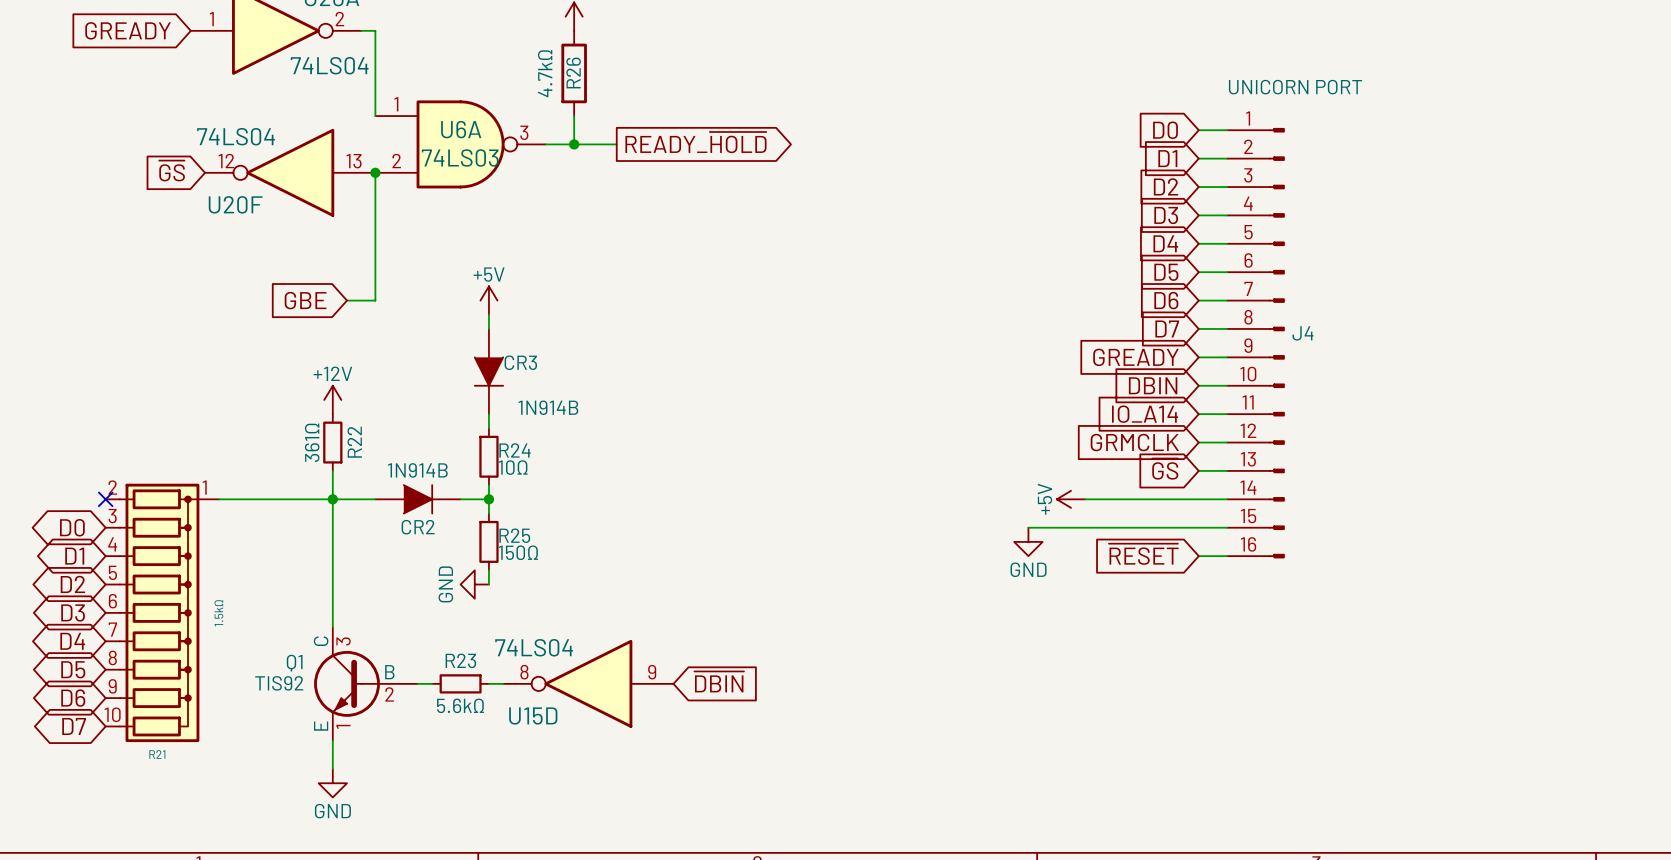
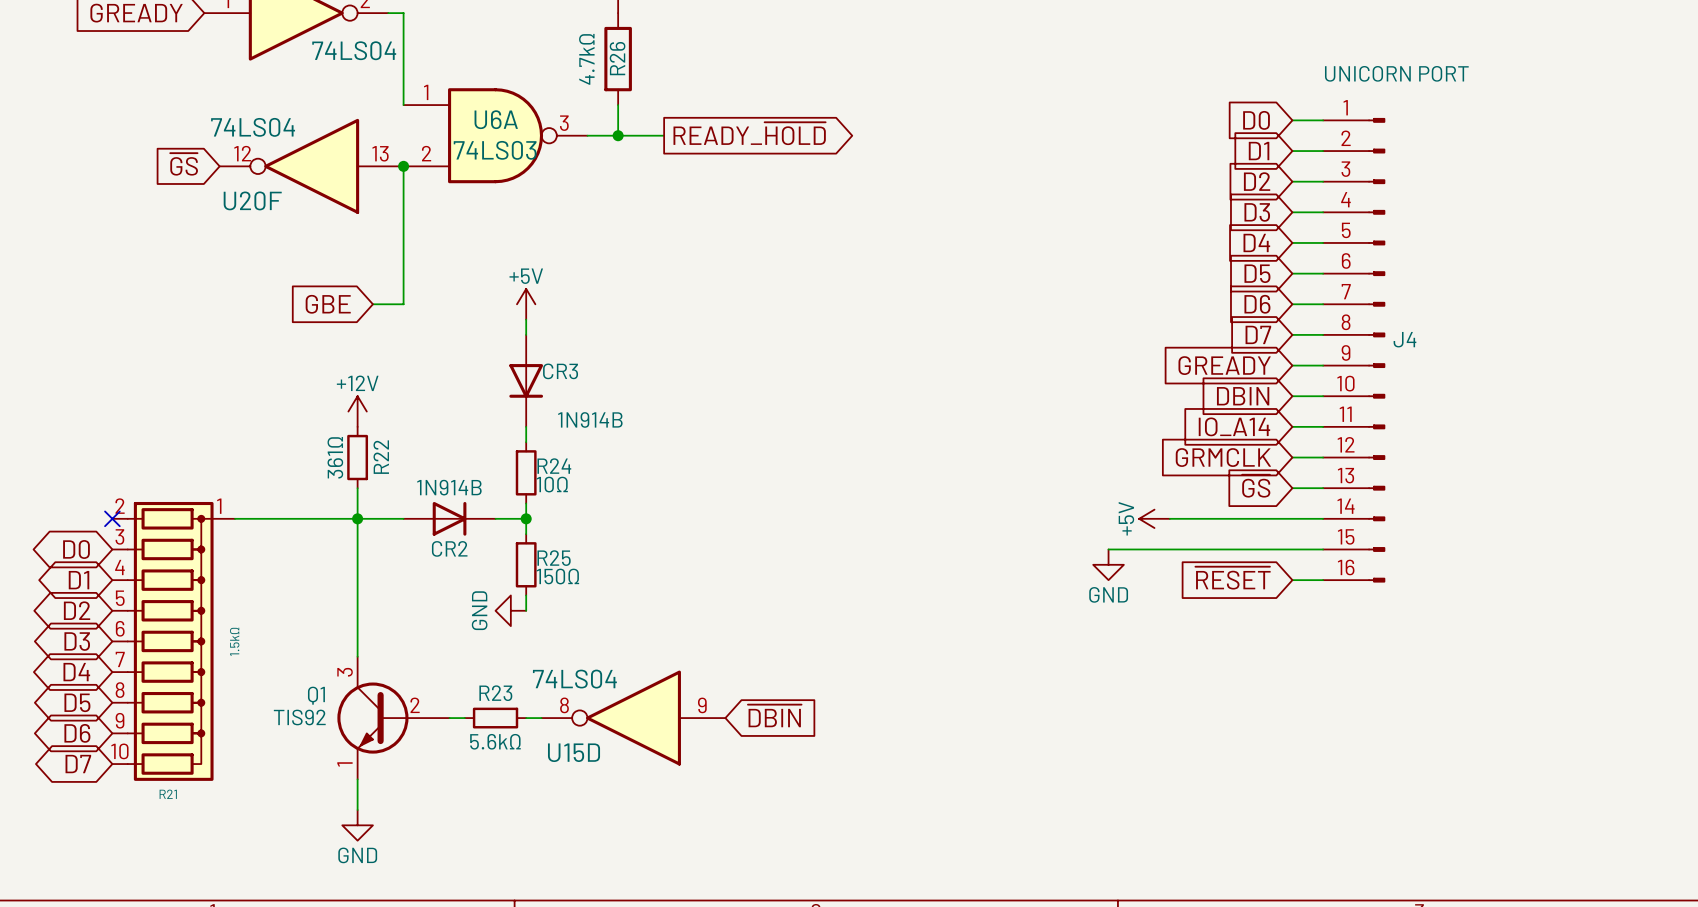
CR3 symbol: [473, 328, 505, 415] -> [509, 334, 544, 427]
CR2 symbol: [375, 484, 461, 515] -> [403, 501, 496, 536]
Q1 symbol: [314, 627, 418, 741] -> [337, 656, 450, 780]

